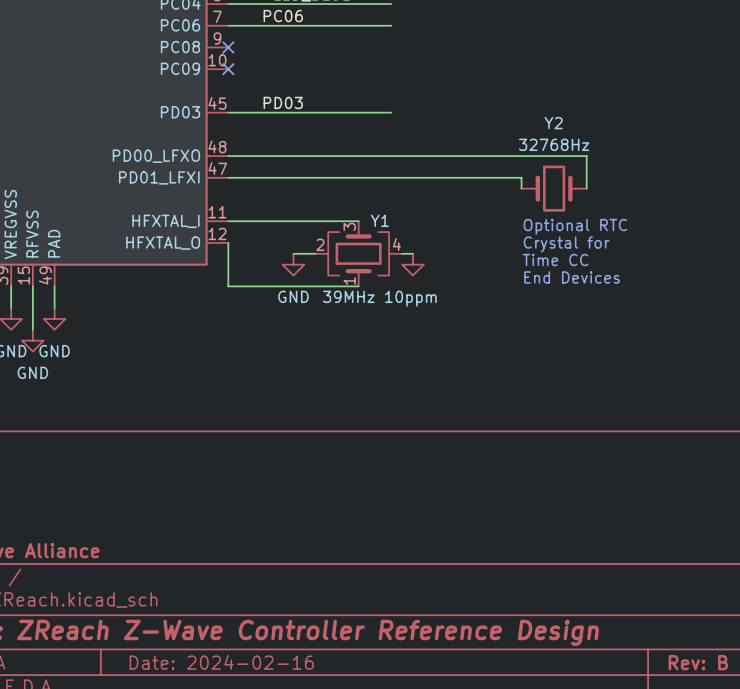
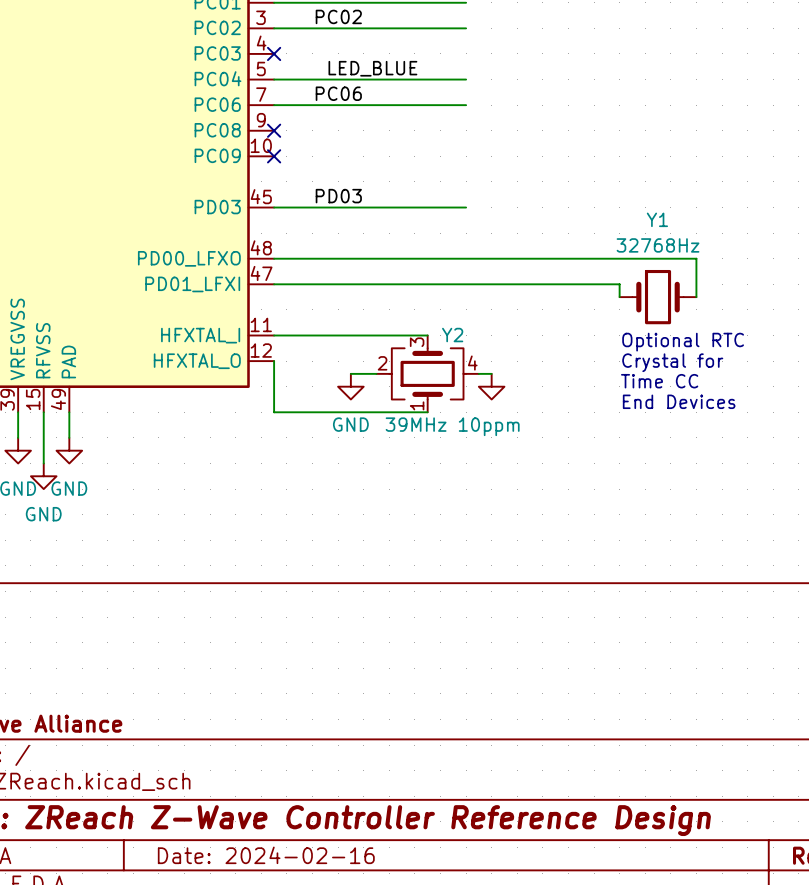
Y2 name: Y2 (553, 123) -> Y1 (657, 219)
Y1 name: Y1 (379, 220) -> Y2 (452, 335)

